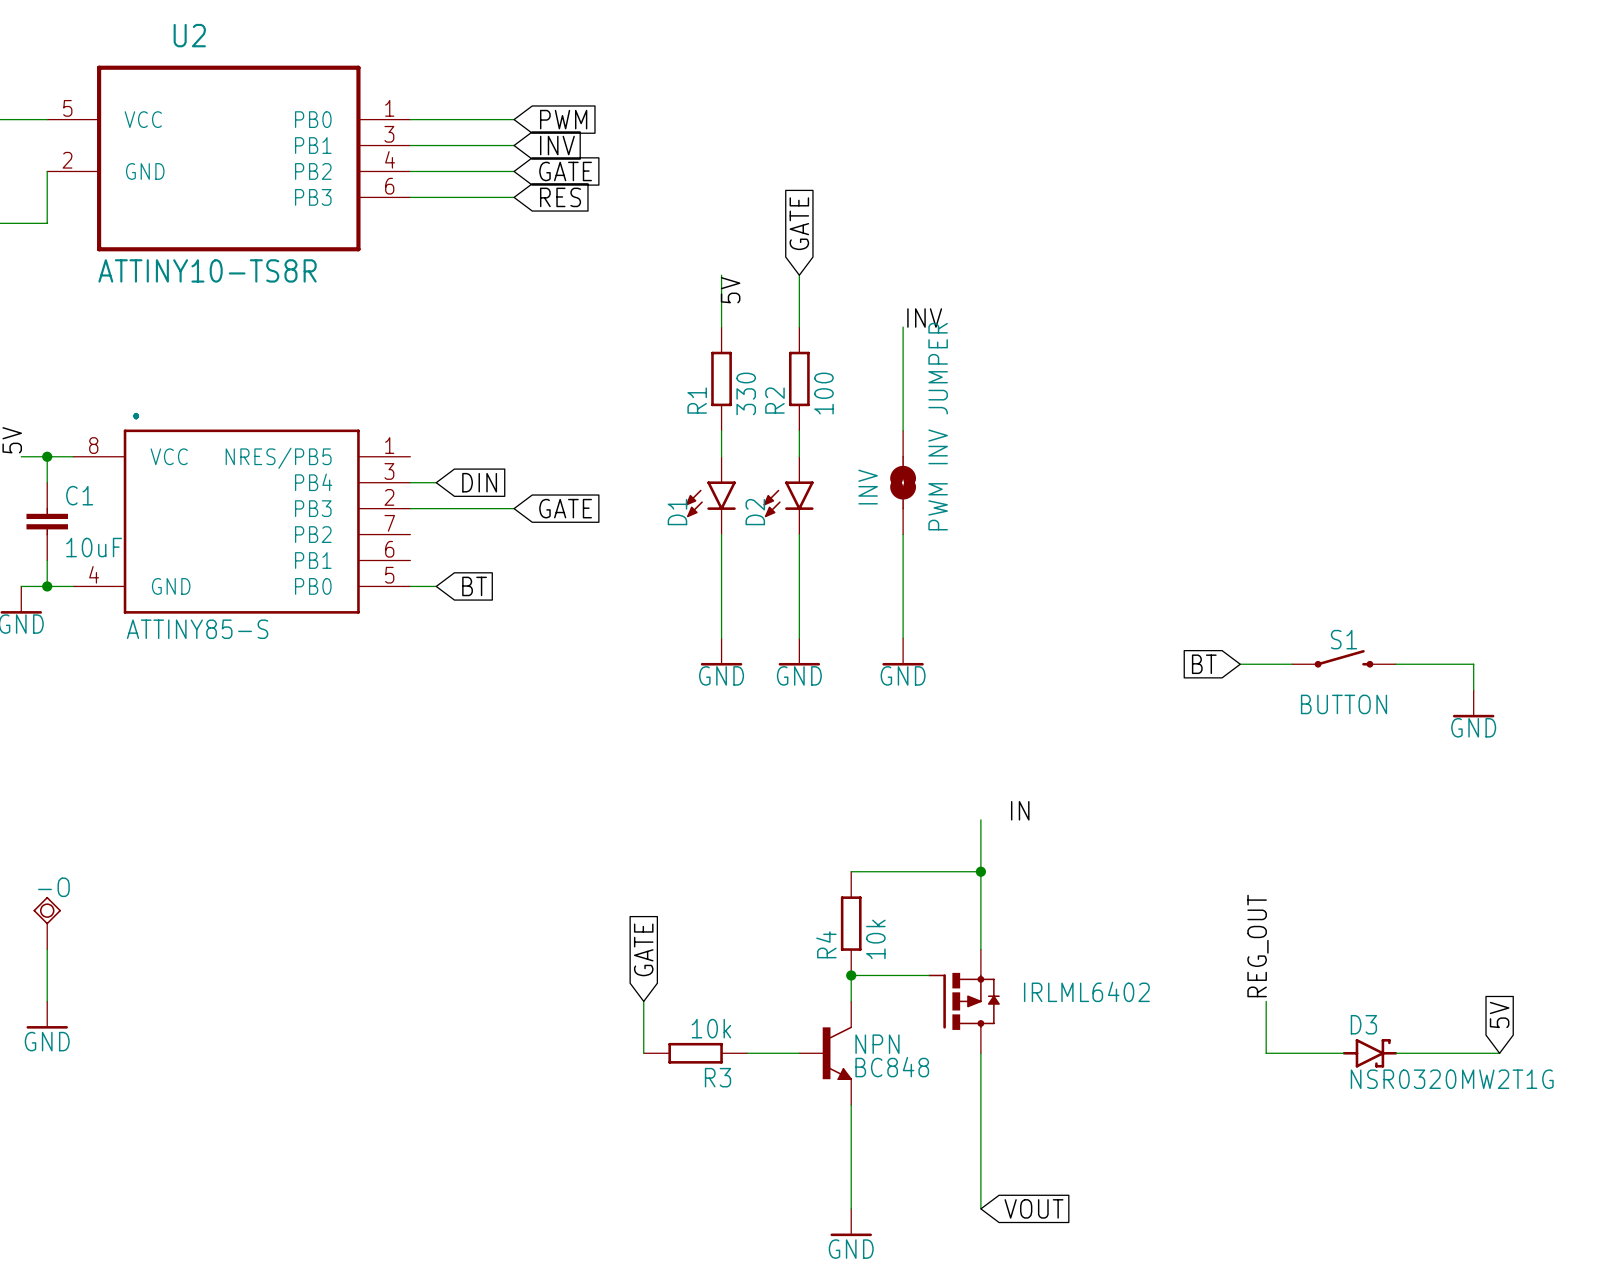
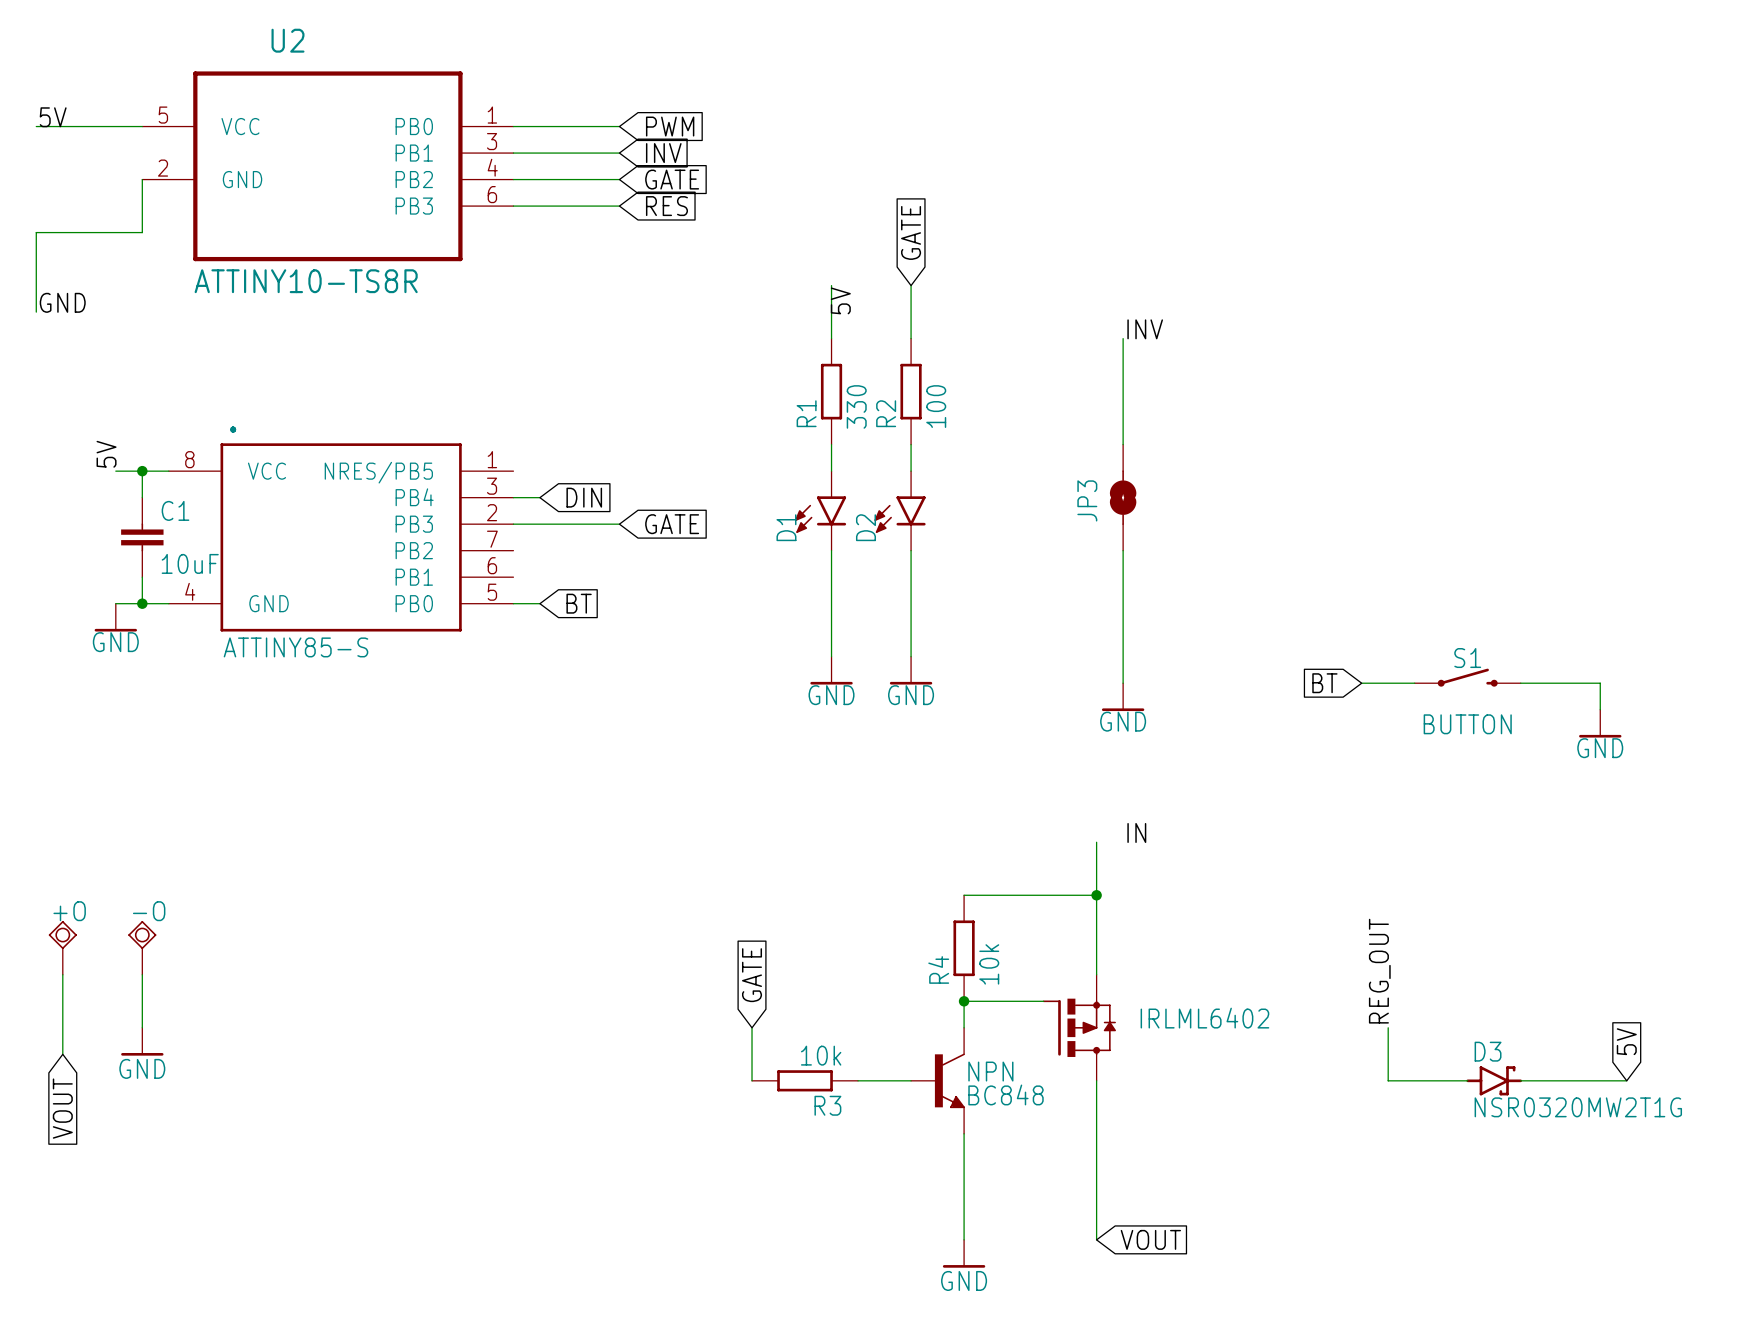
label position: INV (924, 318) -> INV (1145, 329)
wire: (903, 327) (903, 430) -> (1123, 338) (1123, 444)
INV: PWM INV JUMPER (903, 482) -> none
JP3: none -> (1123, 497)
wire: (903, 534) (903, 638) -> none
wire: none -> (1123, 550) (1123, 683)
power symbol position: GND (903, 651) -> GND (1123, 697)

